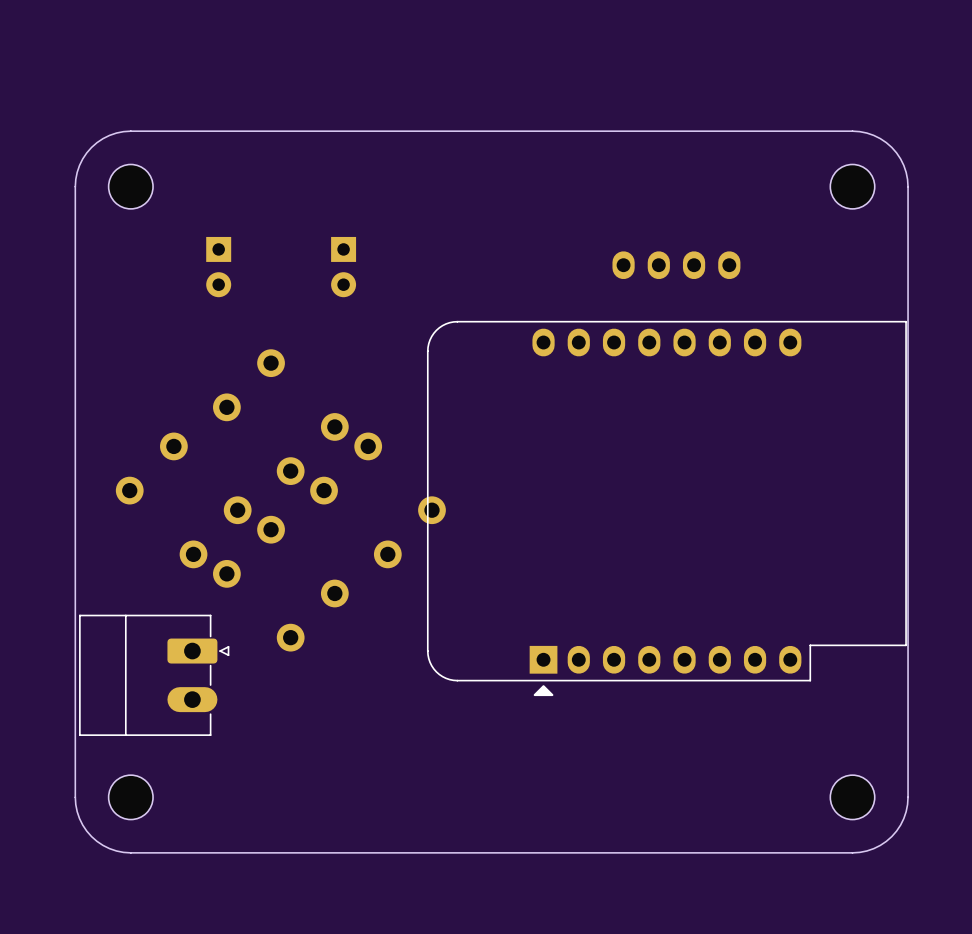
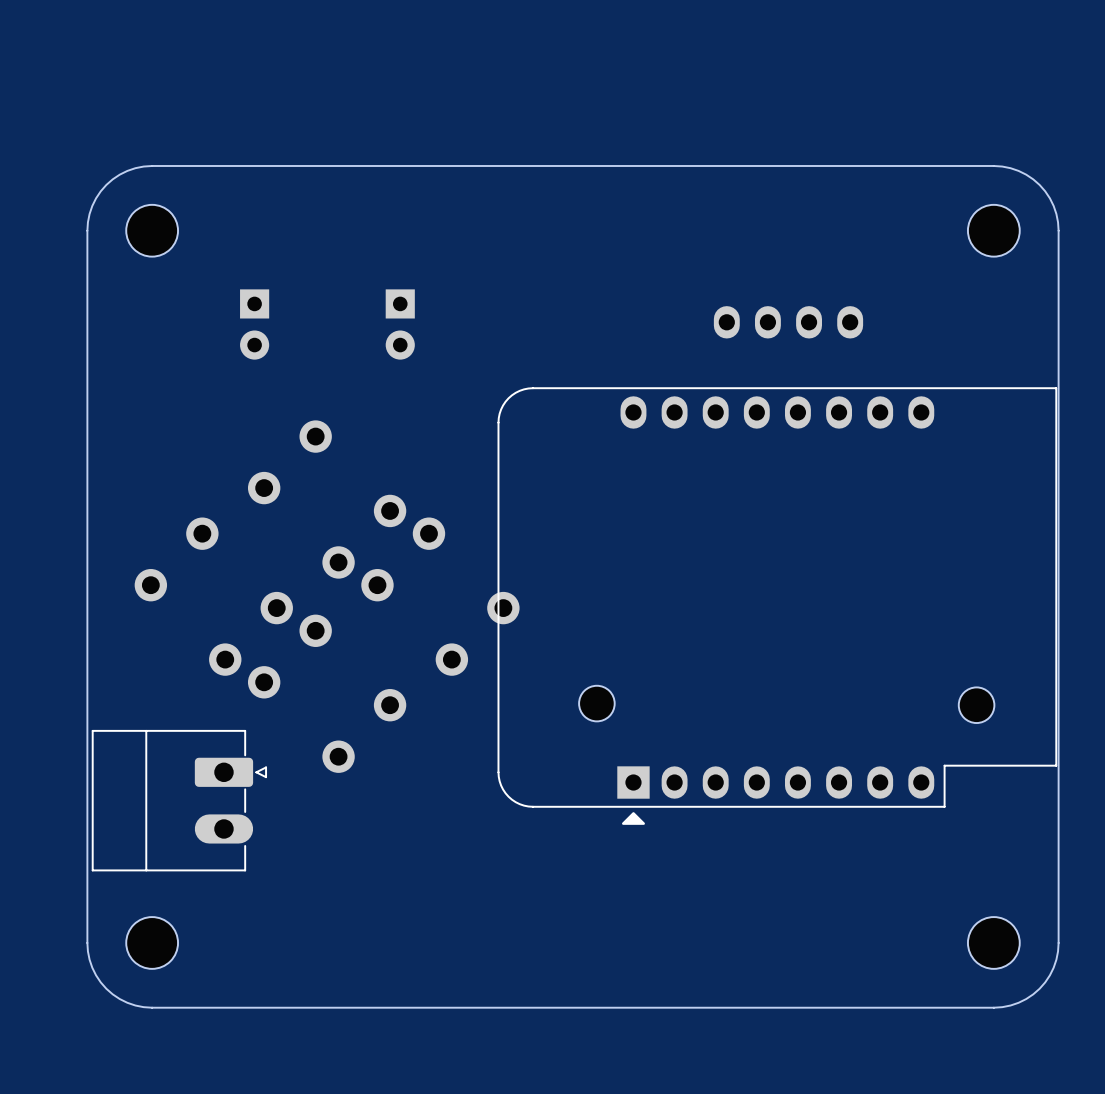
part: none -> (596, 703)
part: none -> (976, 705)

